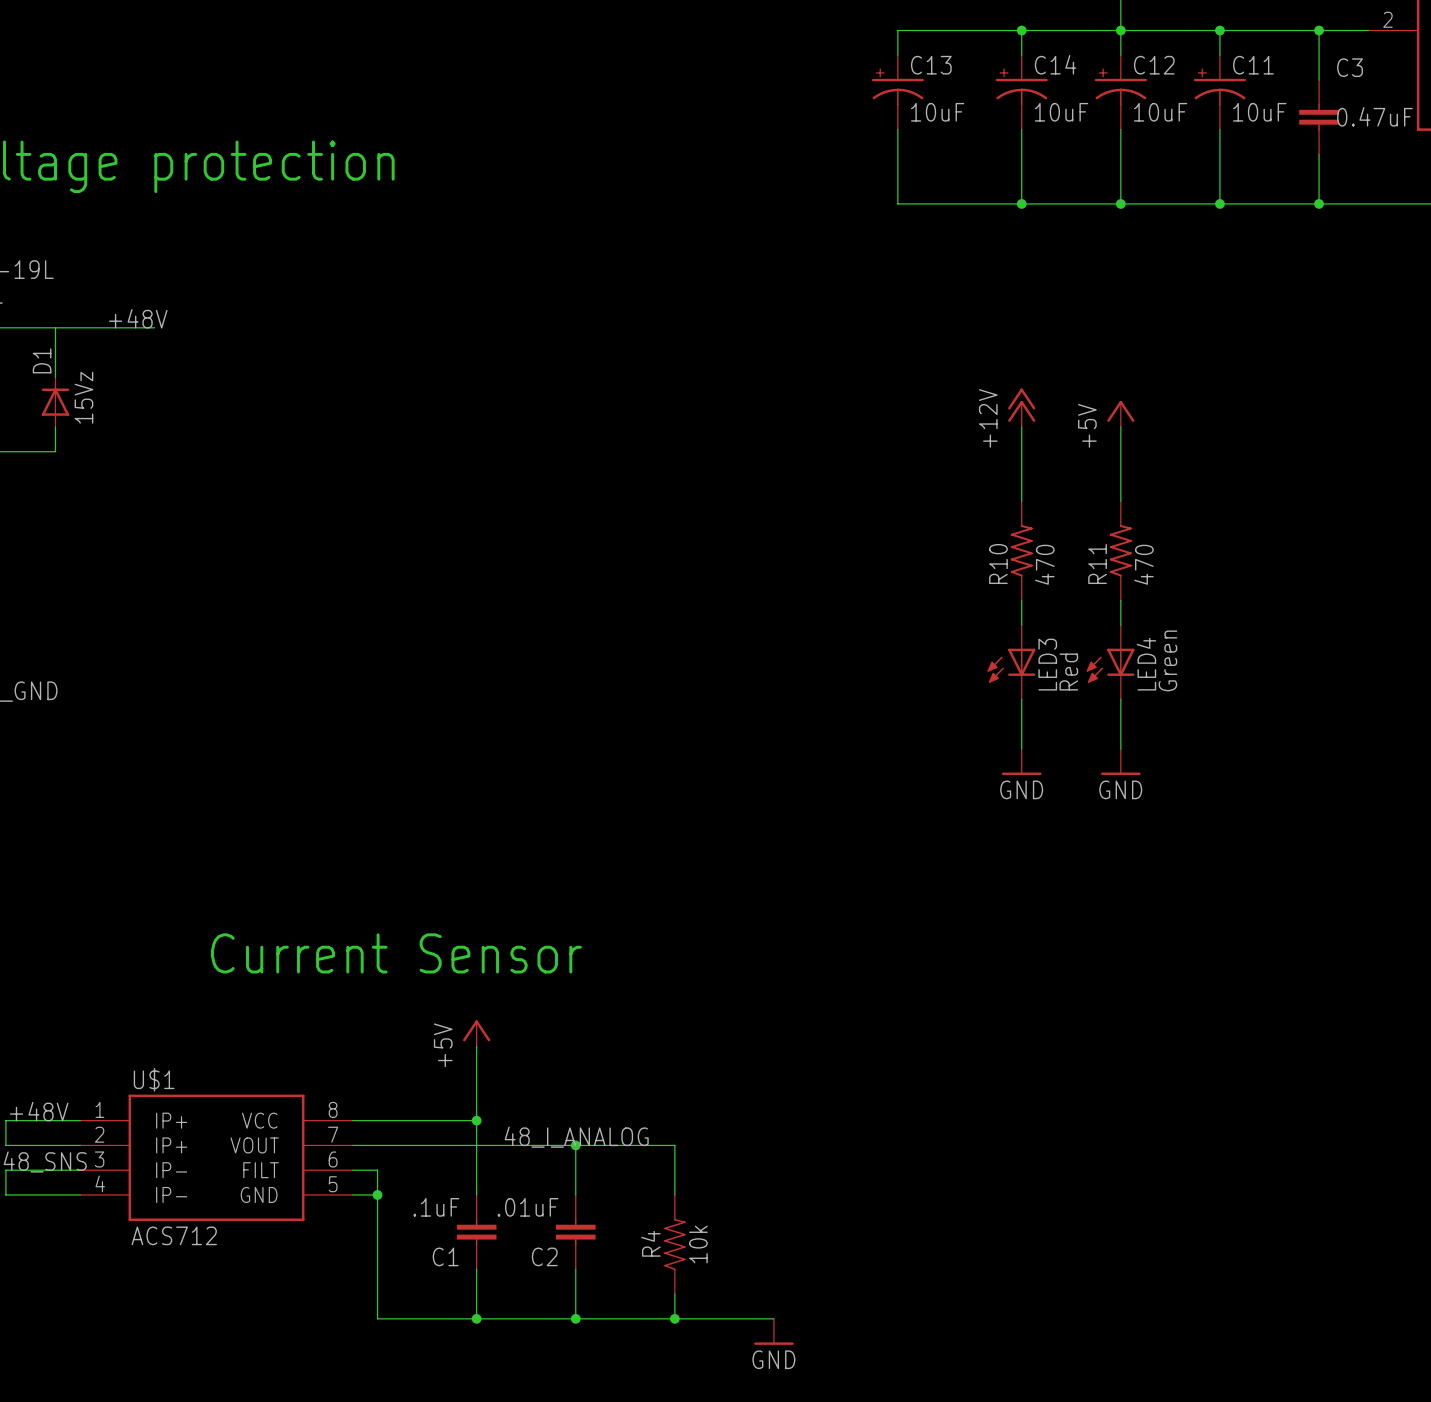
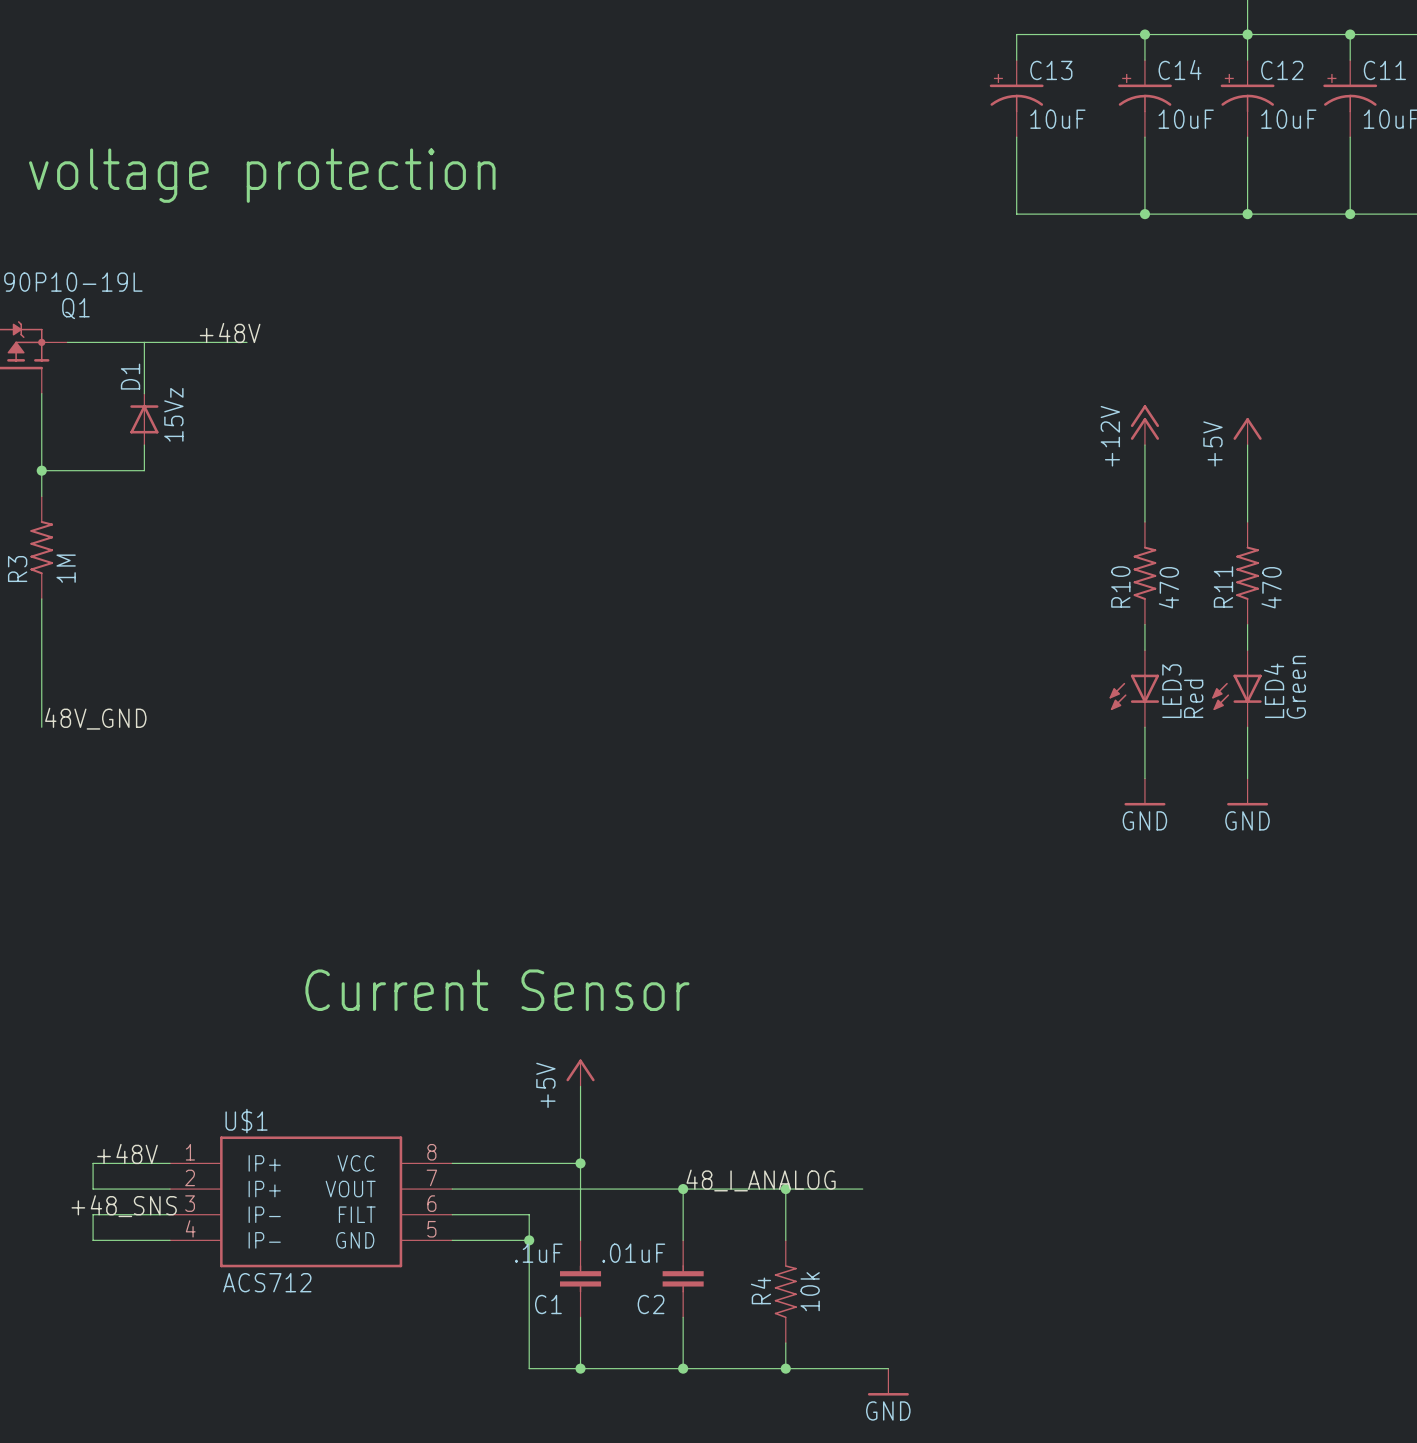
label position: 48_I_ANALOG (576, 1137) -> 48_I_ANALOG (761, 1180)
wire: none -> (785, 1189) (862, 1189)
junction: none -> (785, 1189)
wire: (377, 1170) (377, 1318) (427, 1318) -> (477, 1214) (529, 1214) (529, 1368)
wire: none -> (477, 1240) (529, 1240)
junction position: (377, 1194) -> (529, 1240)

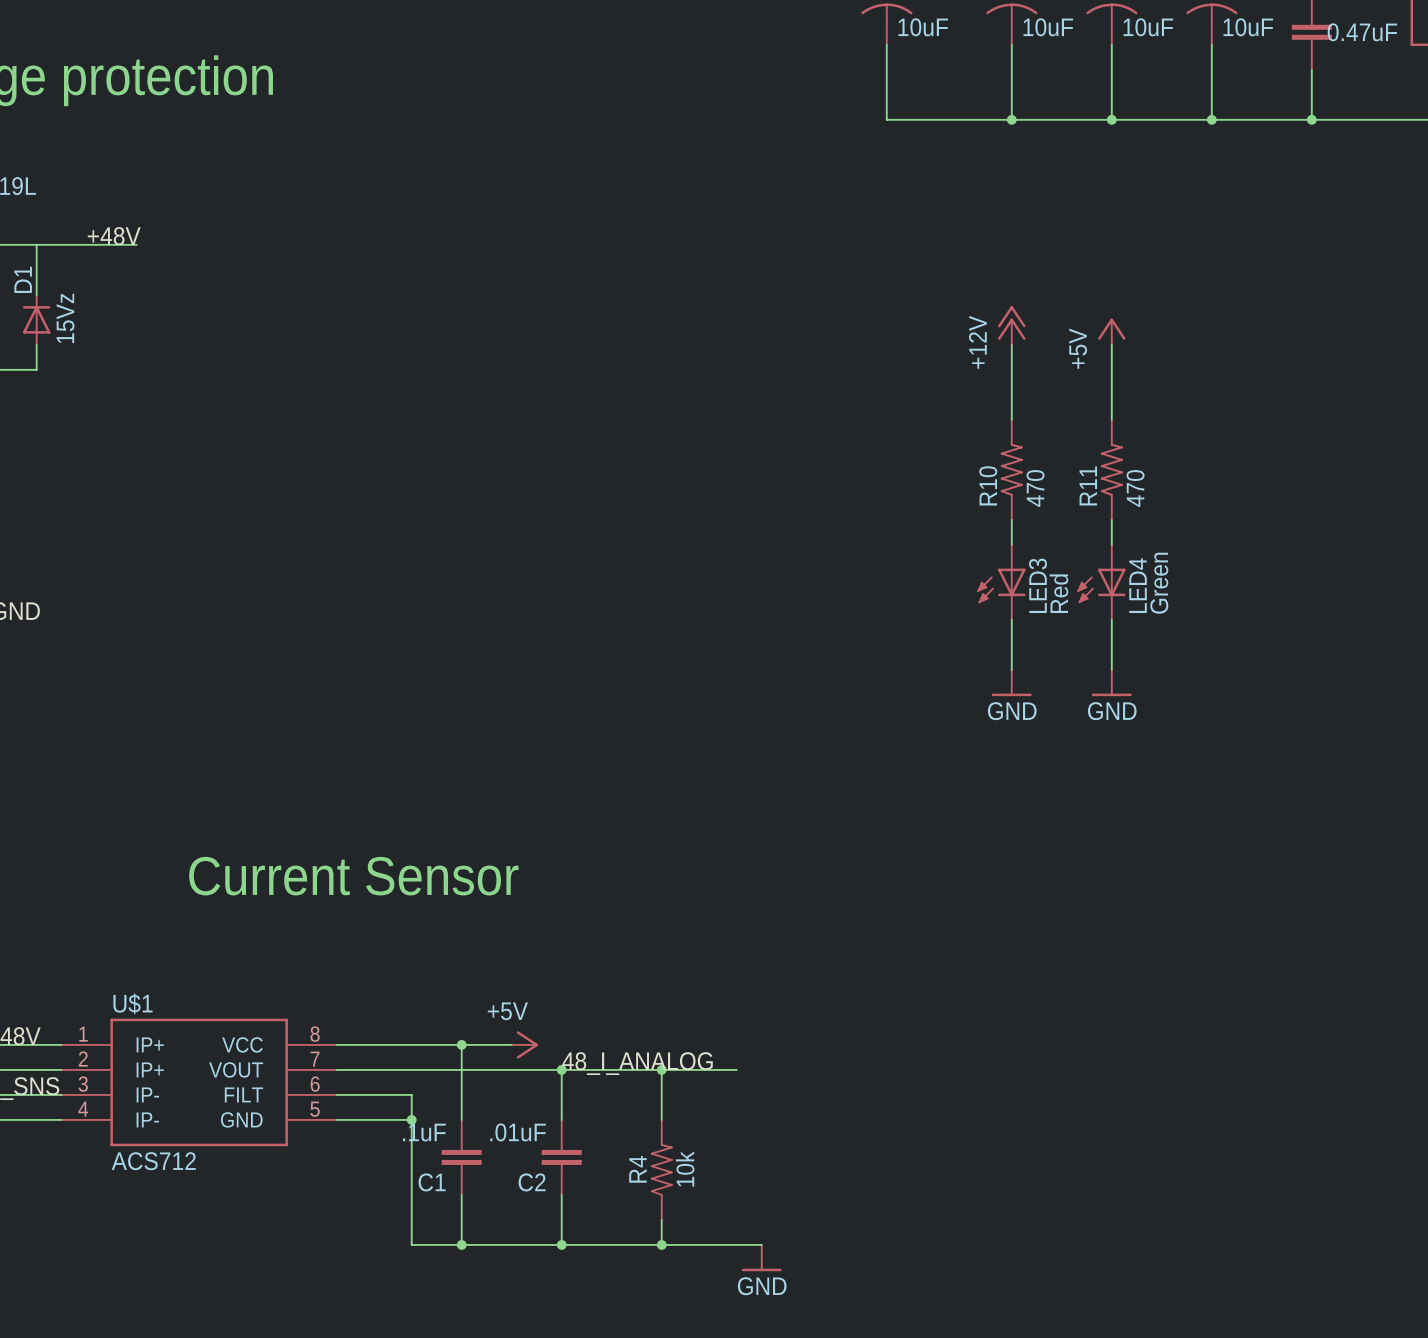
power symbol rotation: 0° (580, 1070) -> 90° clockwise (527, 1044)
power symbol position: +5V (580, 1072) -> +5V (524, 1044)
wire: (580, 1086) (580, 1163) -> (511, 1044) (461, 1044)

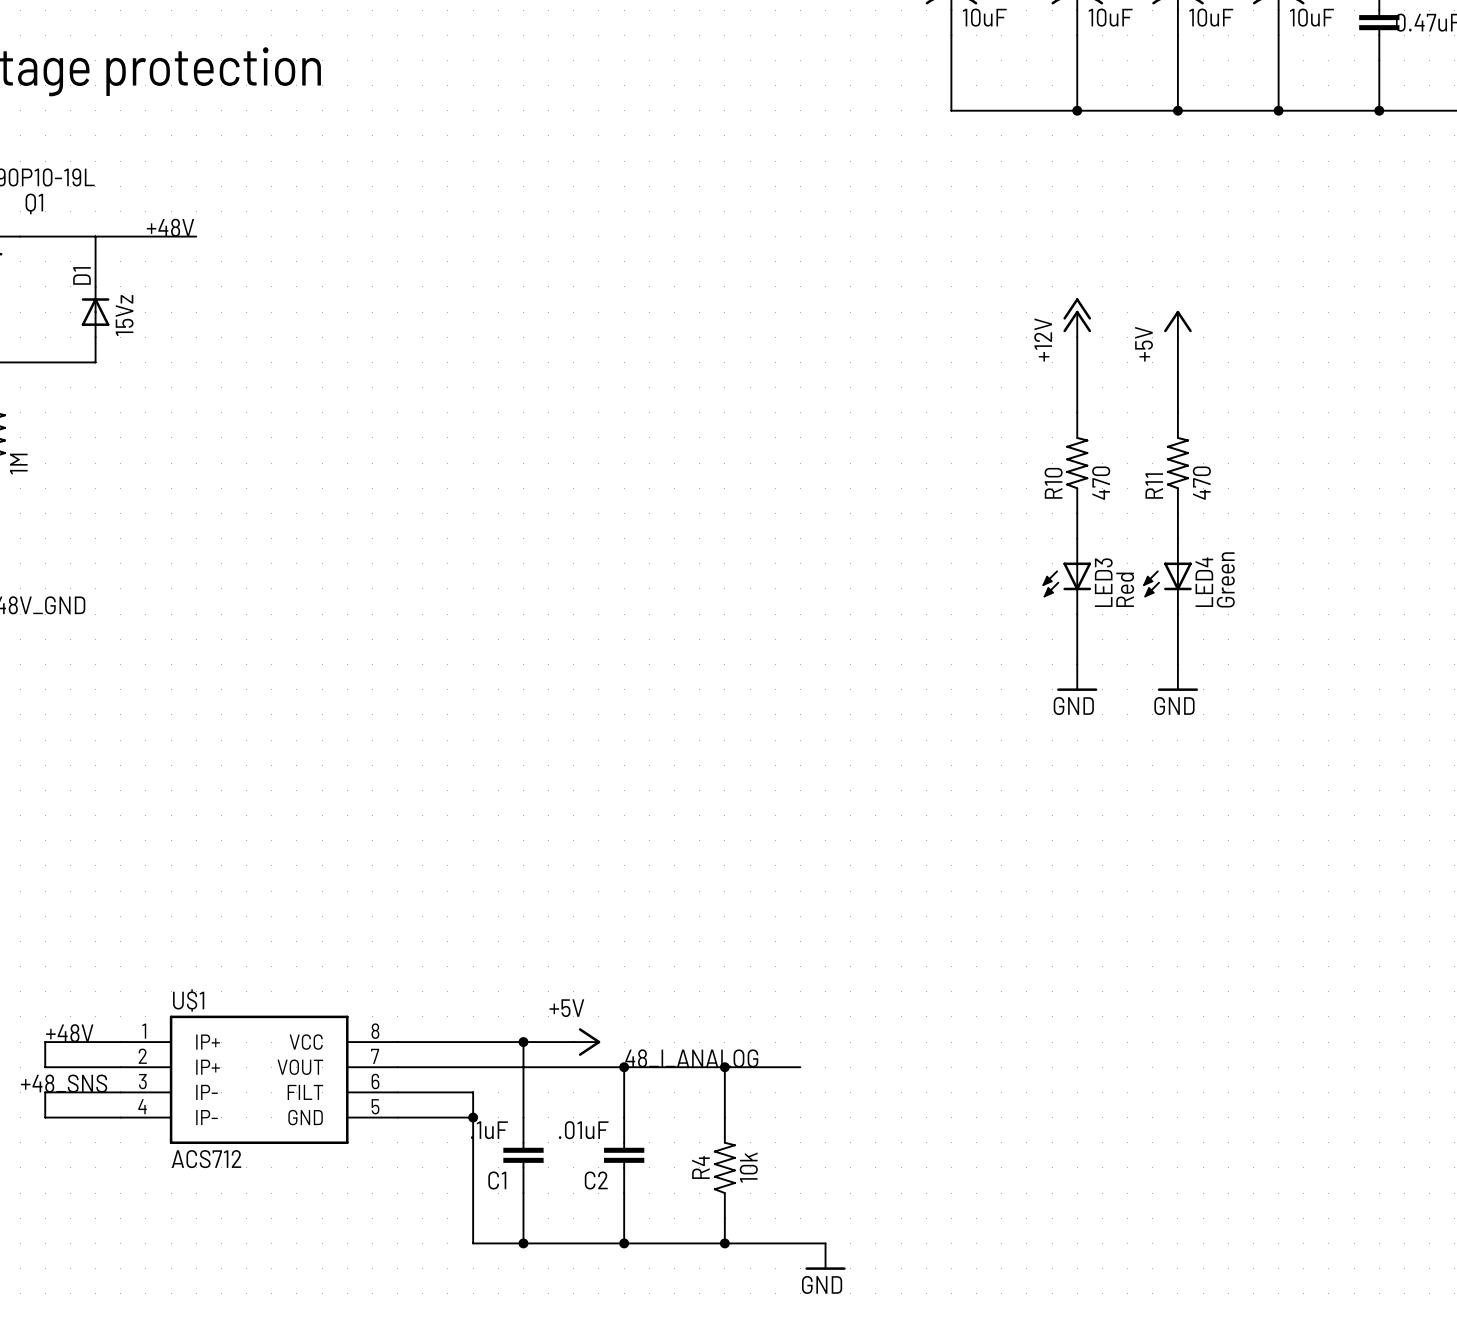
text: Current Sensor (353, 876) -> none

